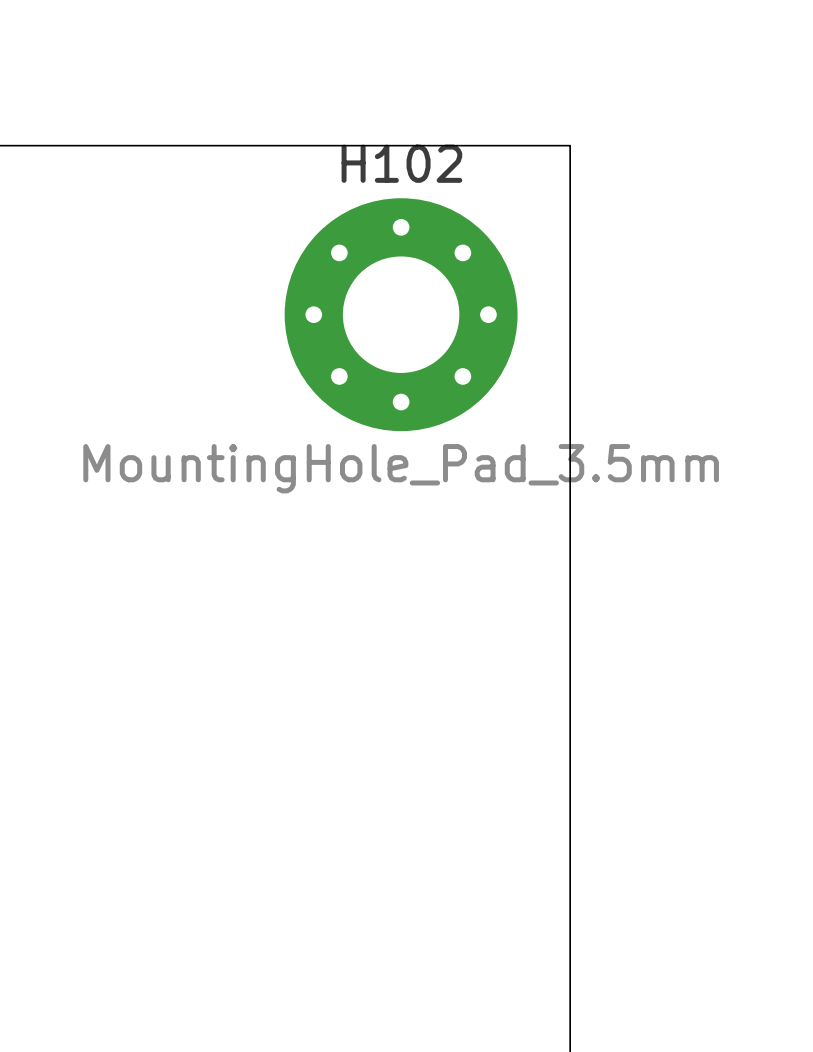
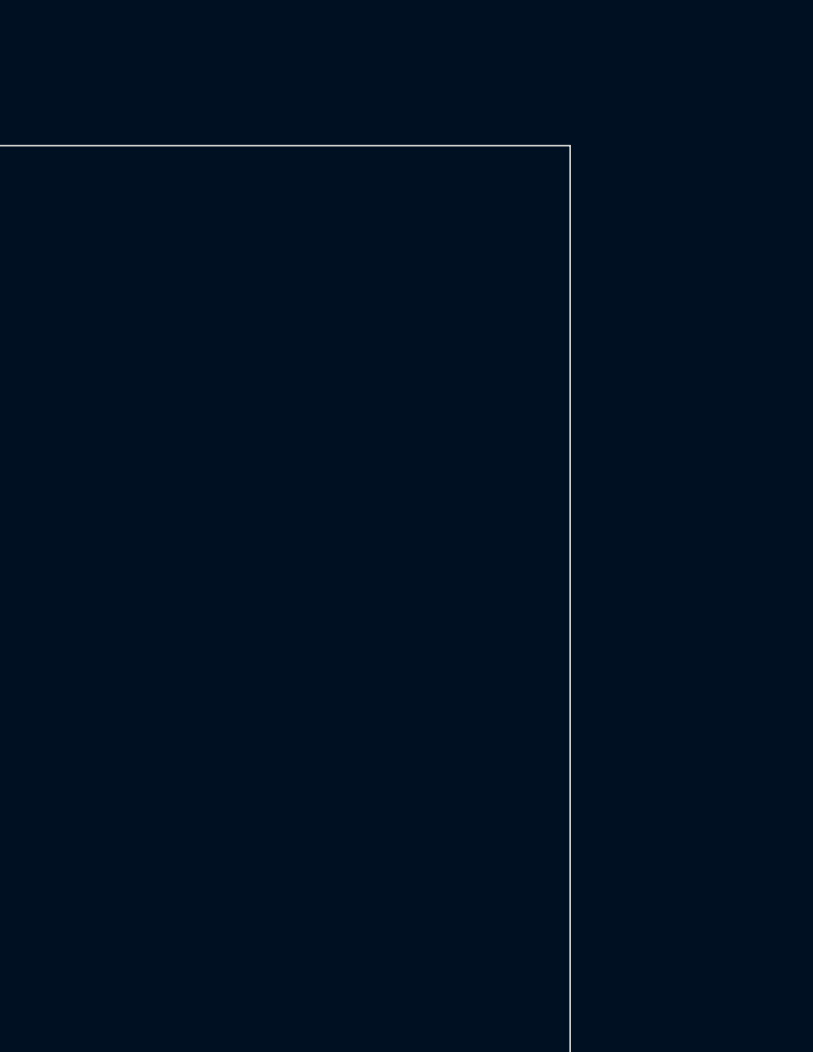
H102: MountingHole_Pad_3.5mm (401, 314) -> none

